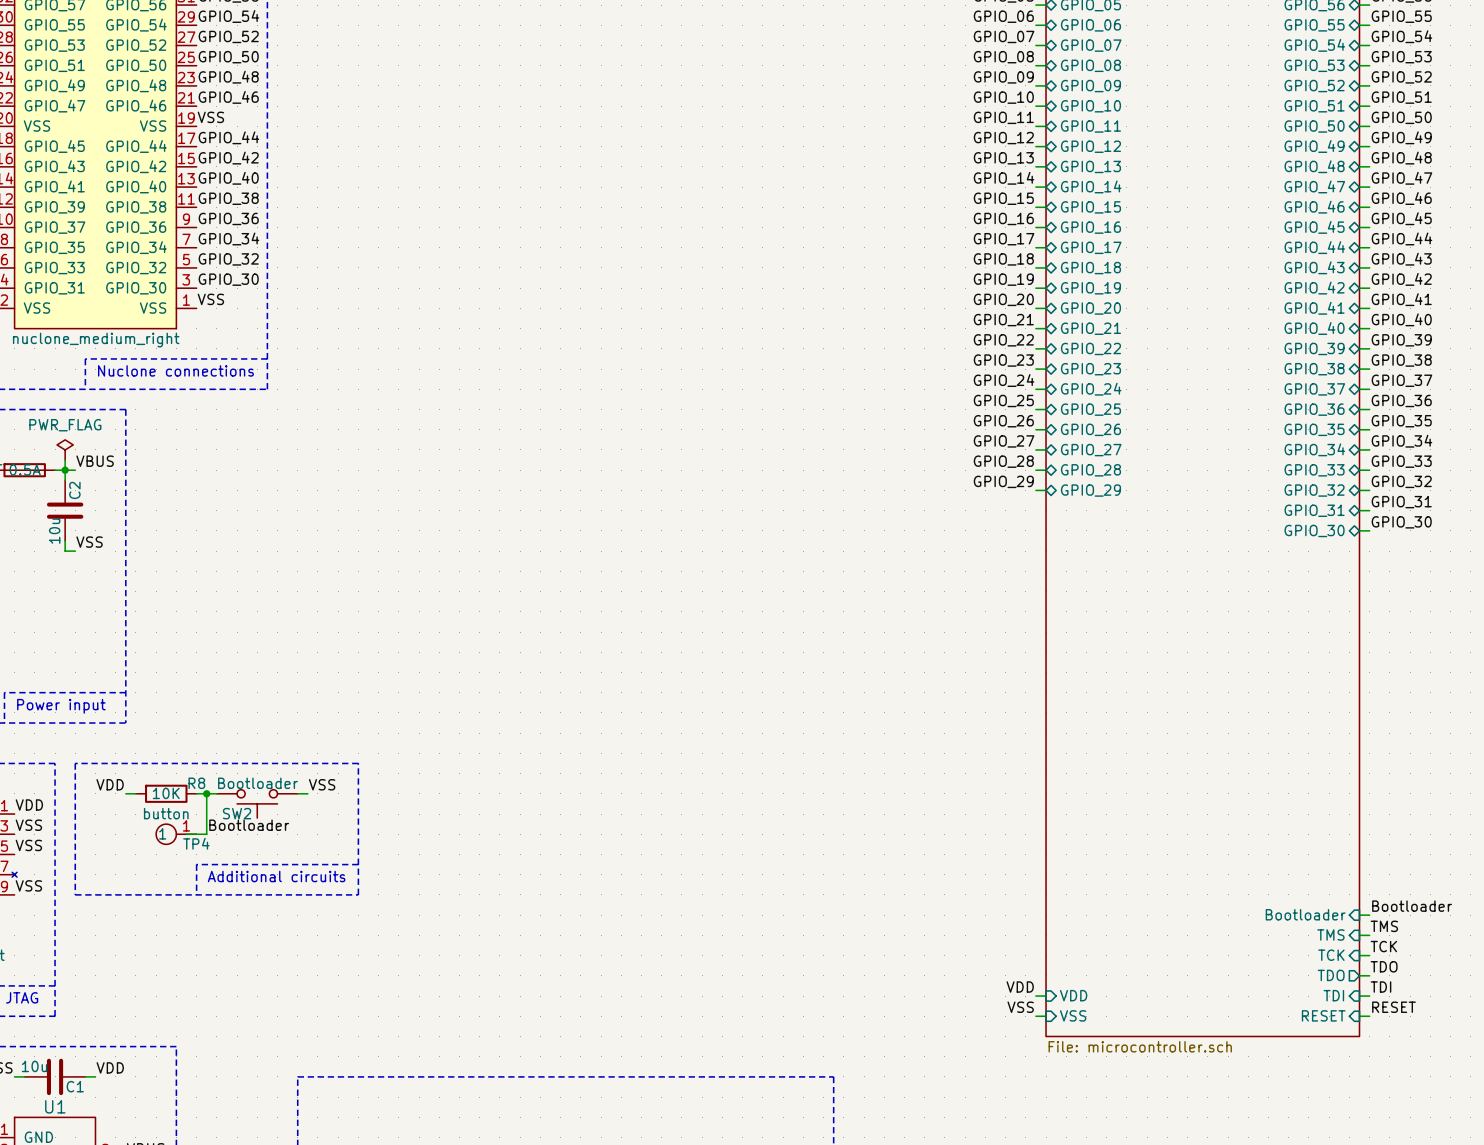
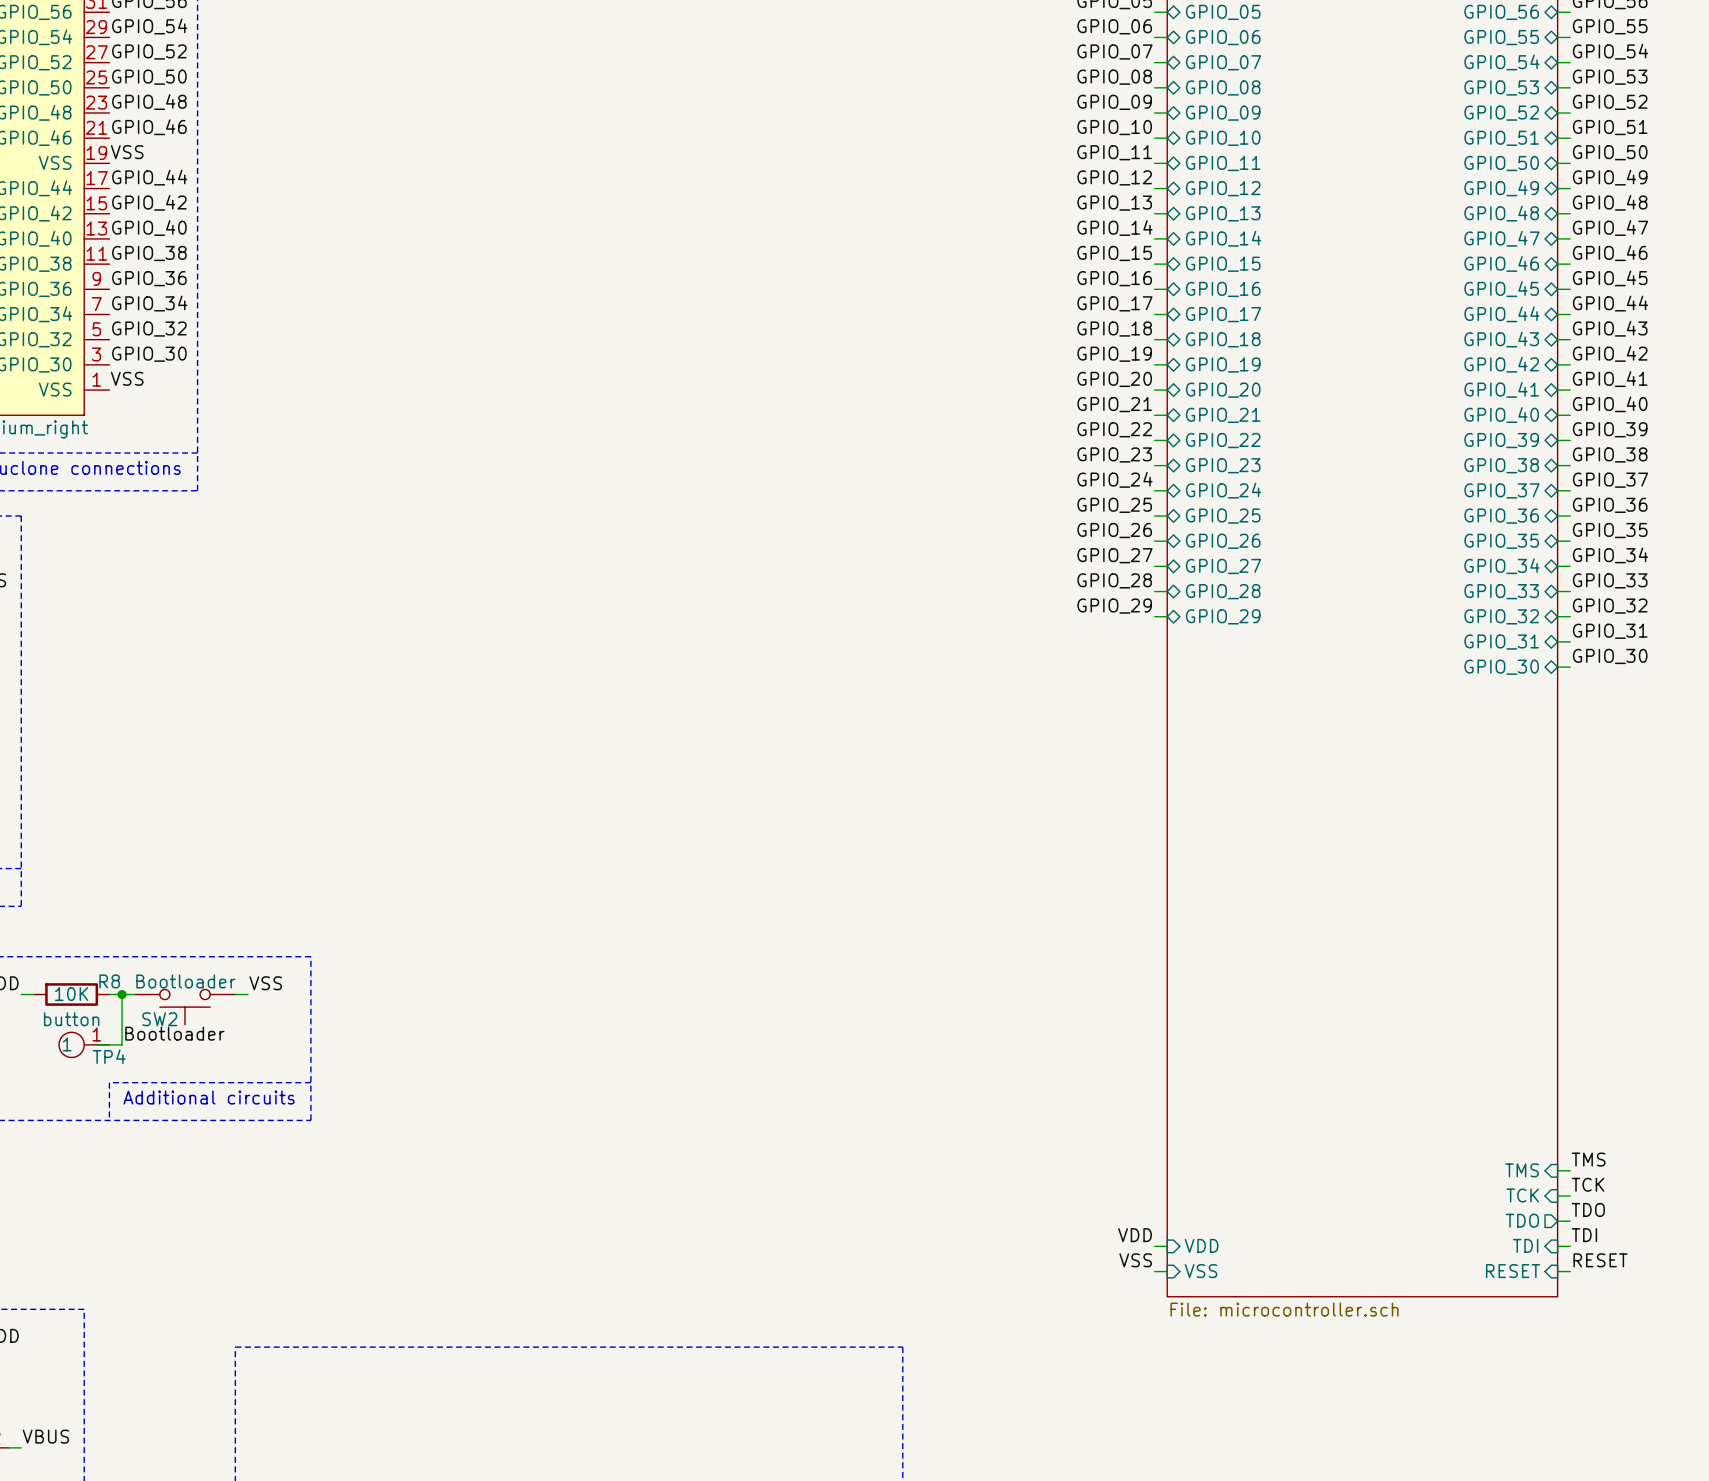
label: Bootloader (1412, 906) -> none
sheet pin: Bootloader (1305, 914) -> none
wire: (1359, 915) (1369, 915) -> none

